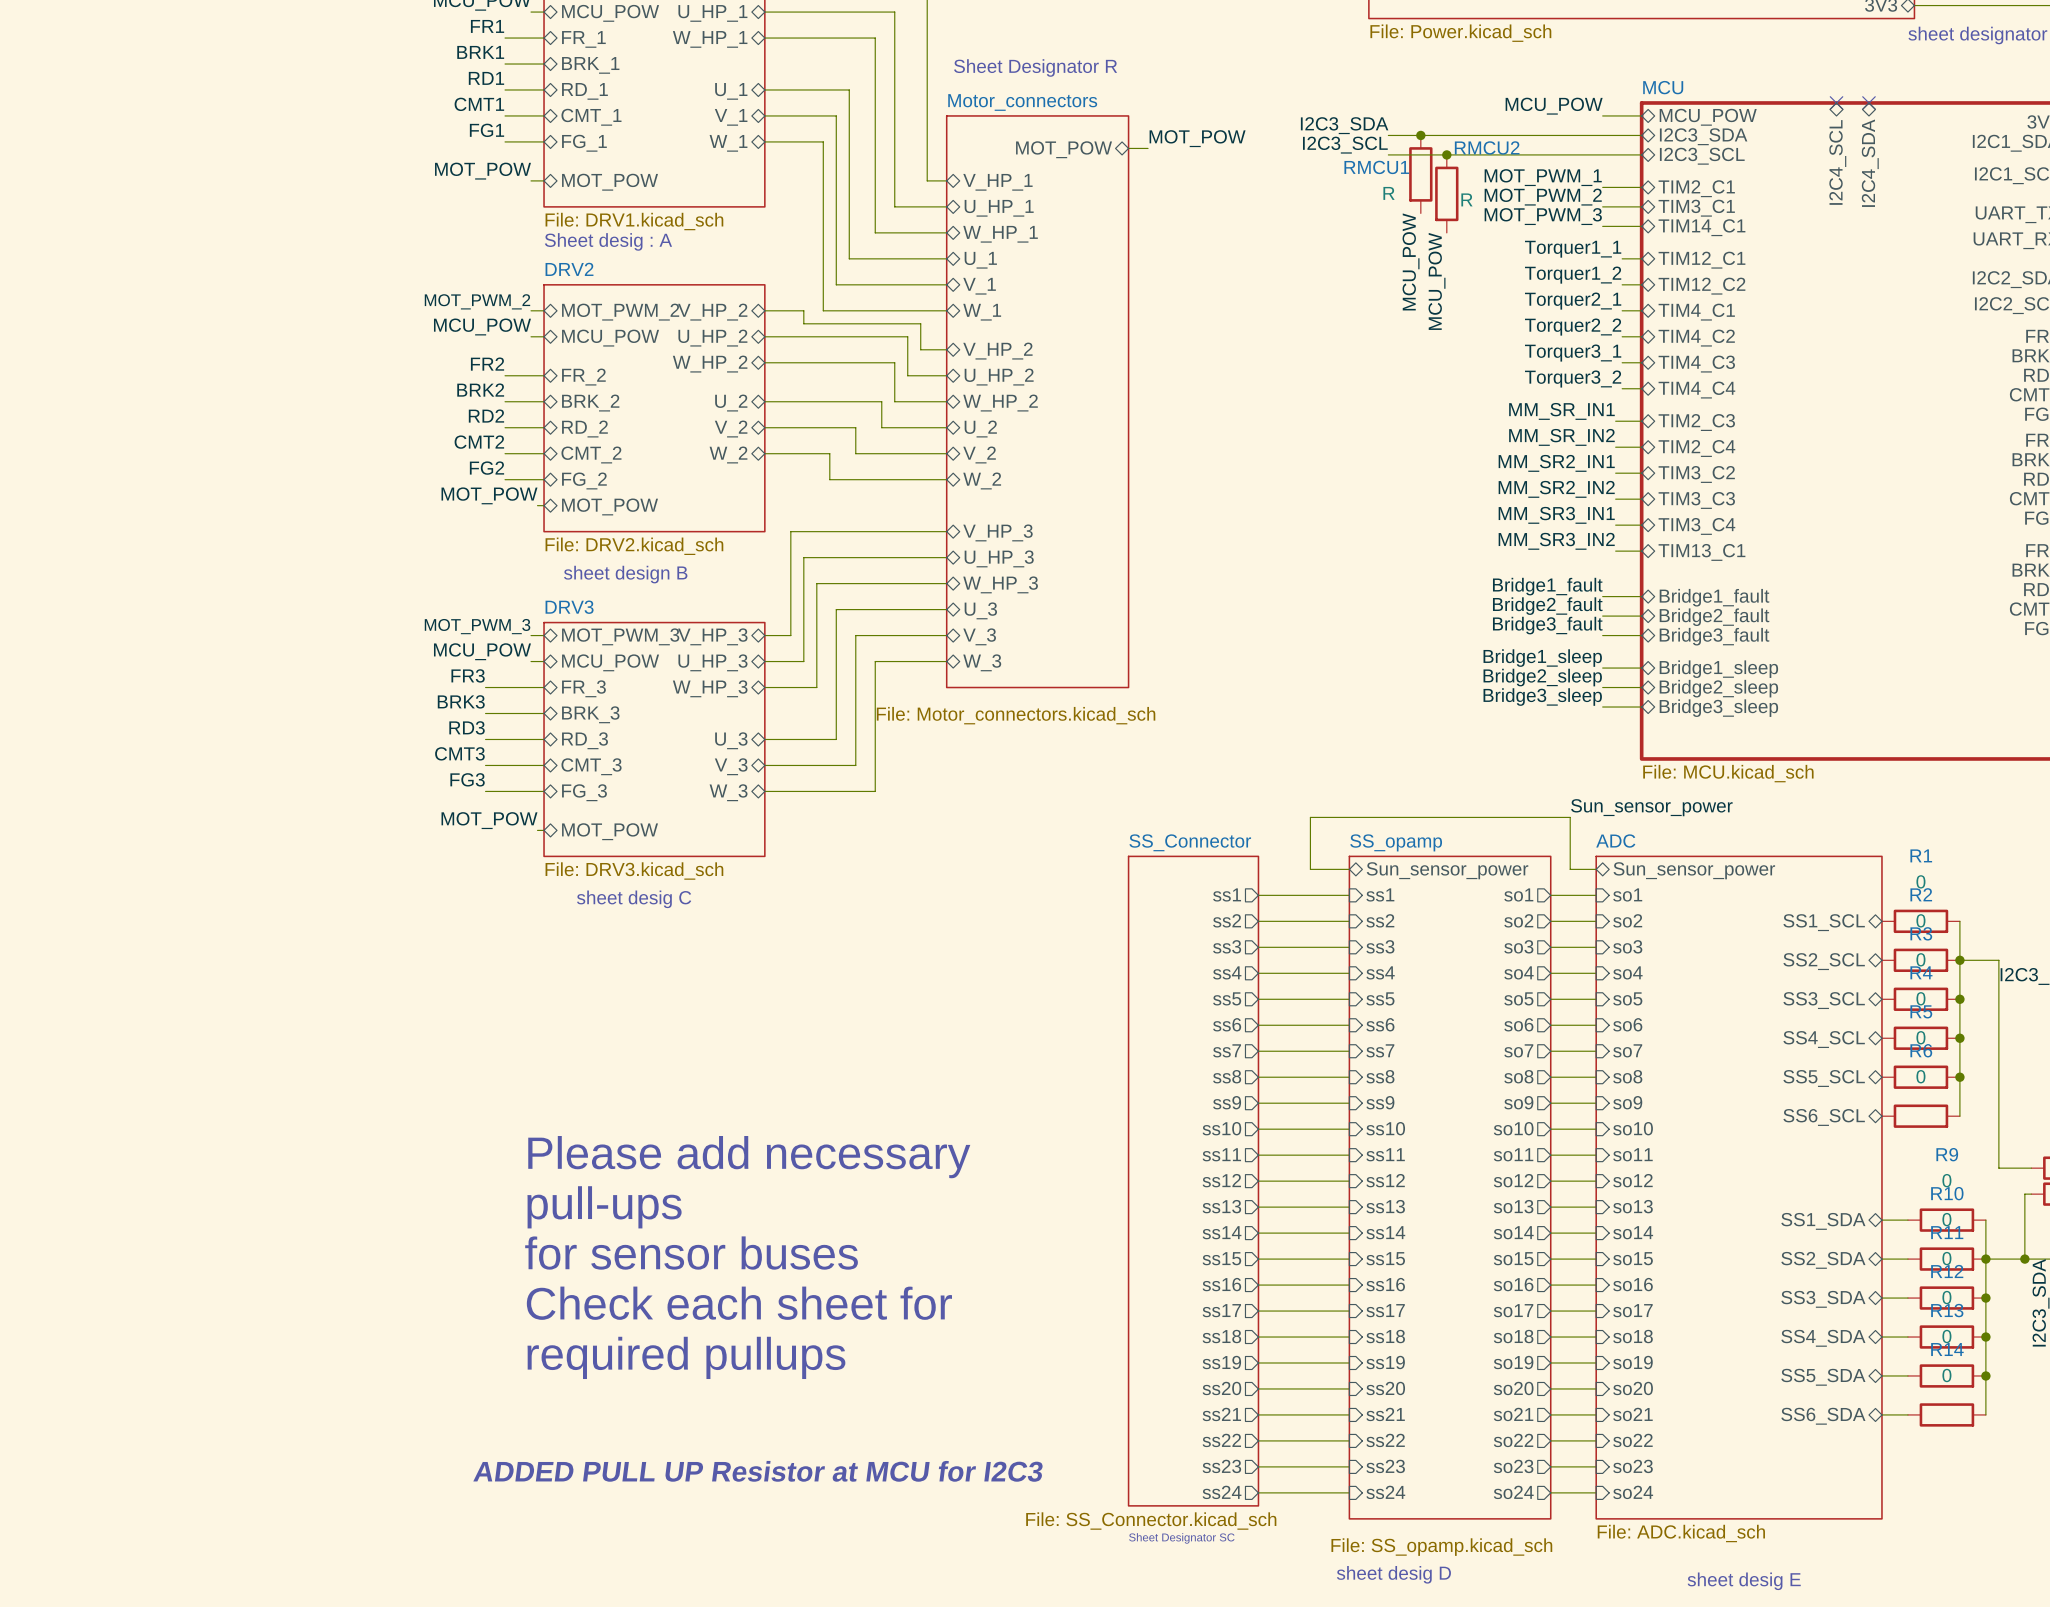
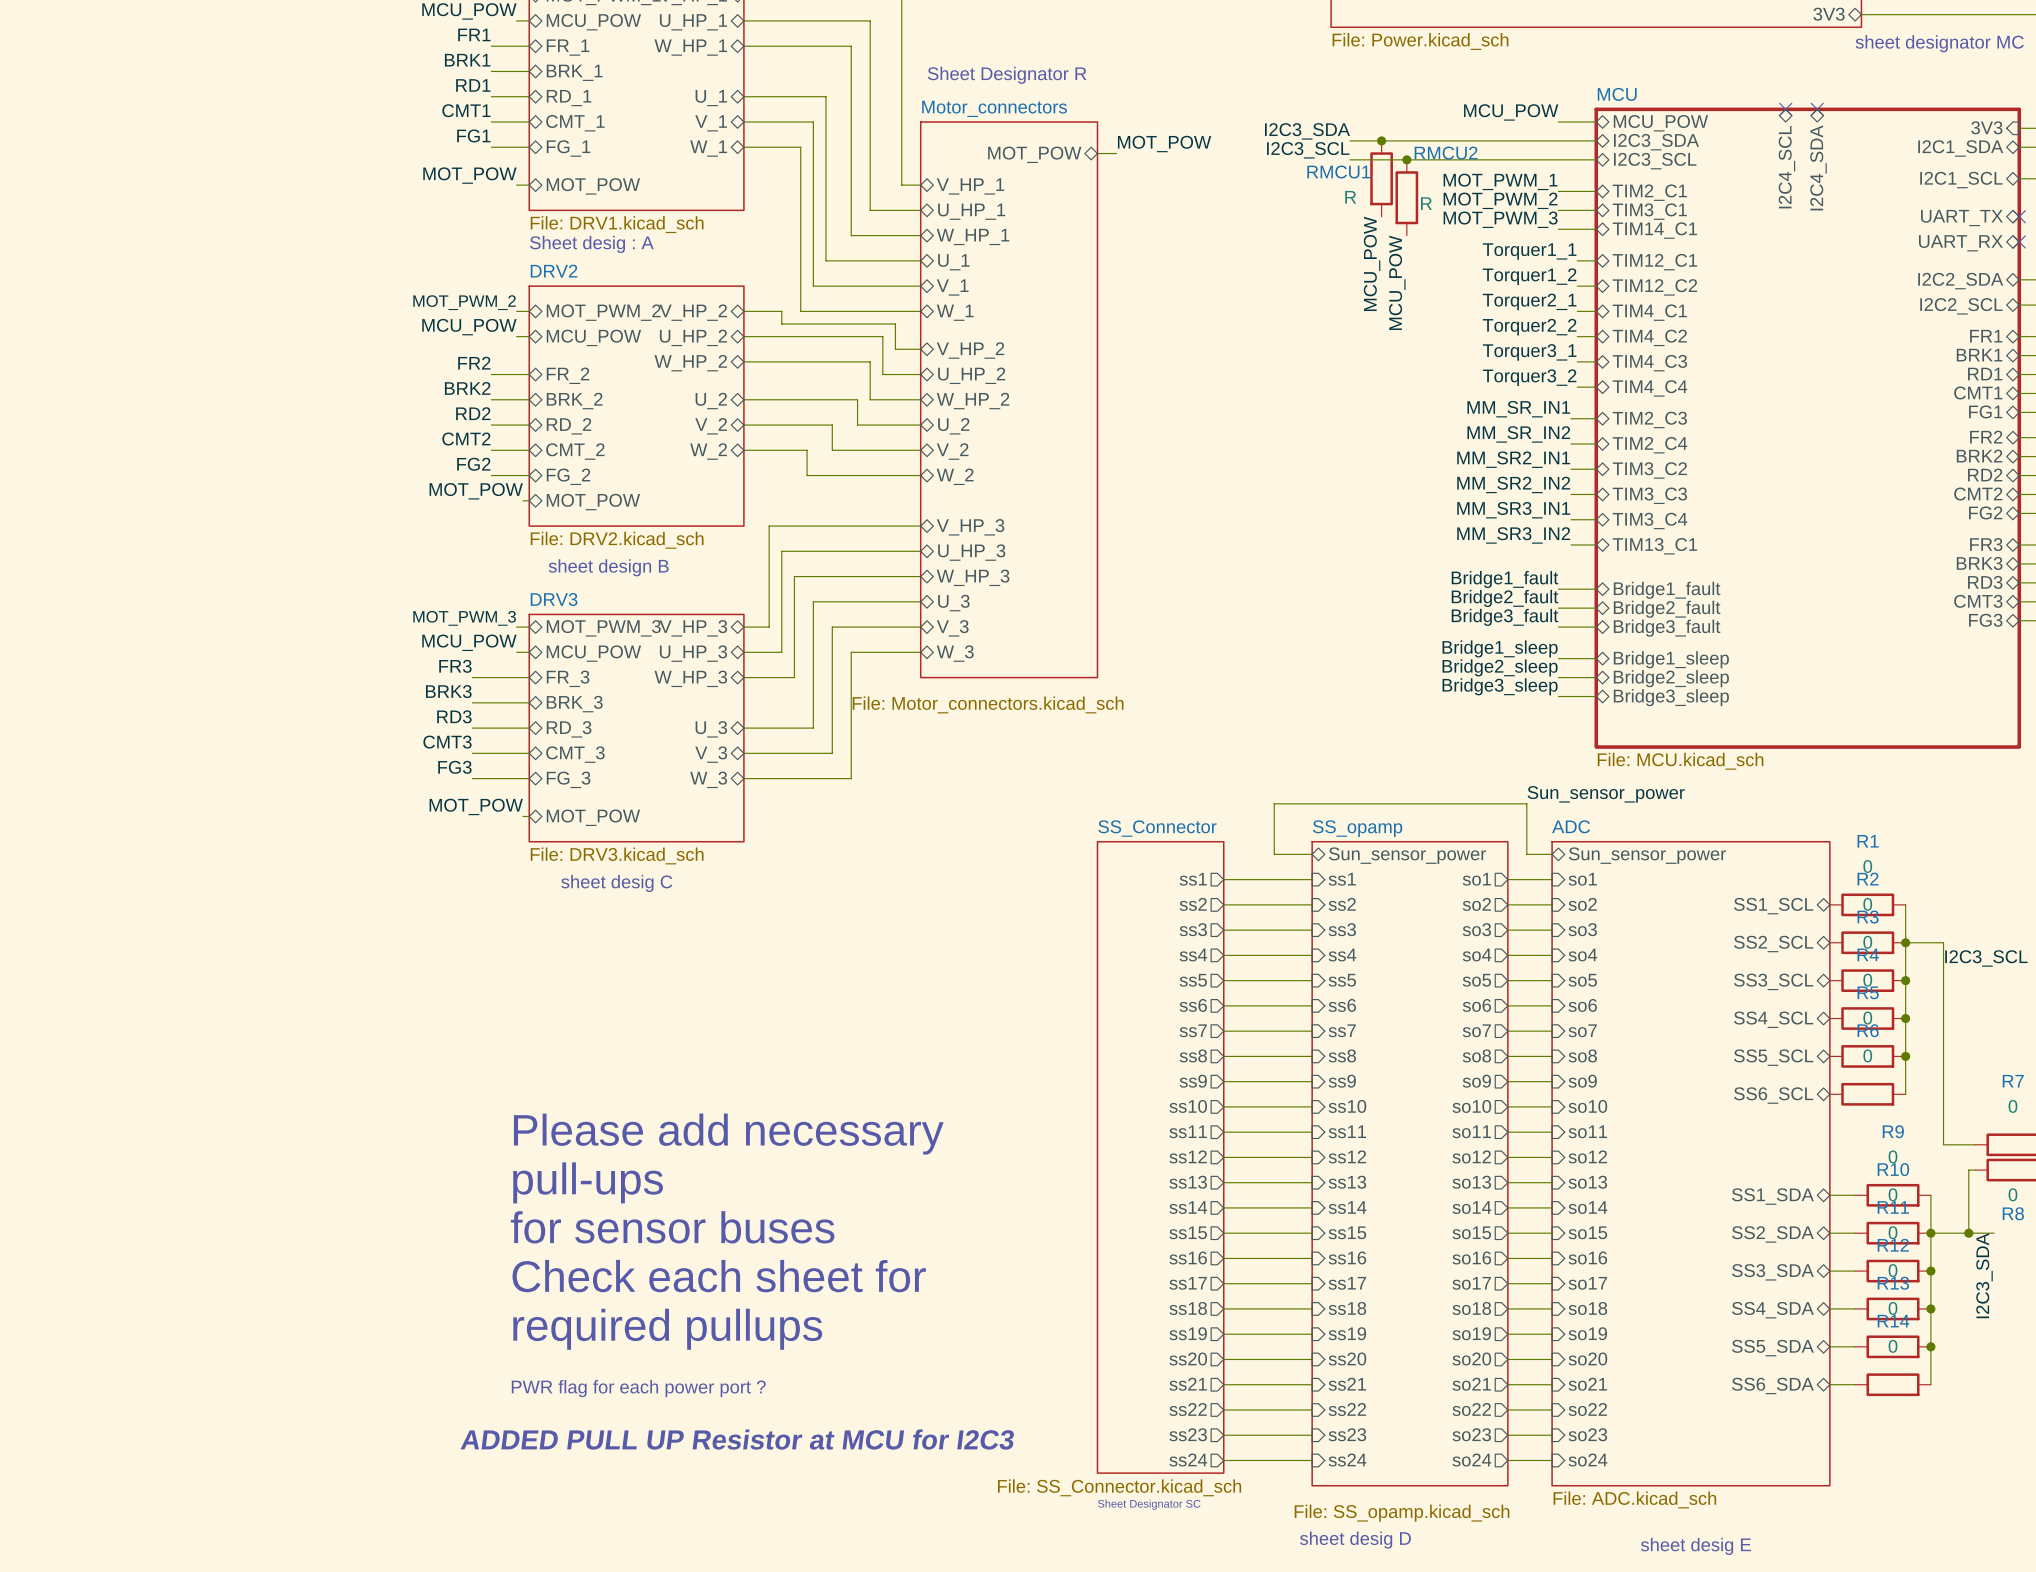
text: none -> PWR flag for each power port ? (638, 1388)

